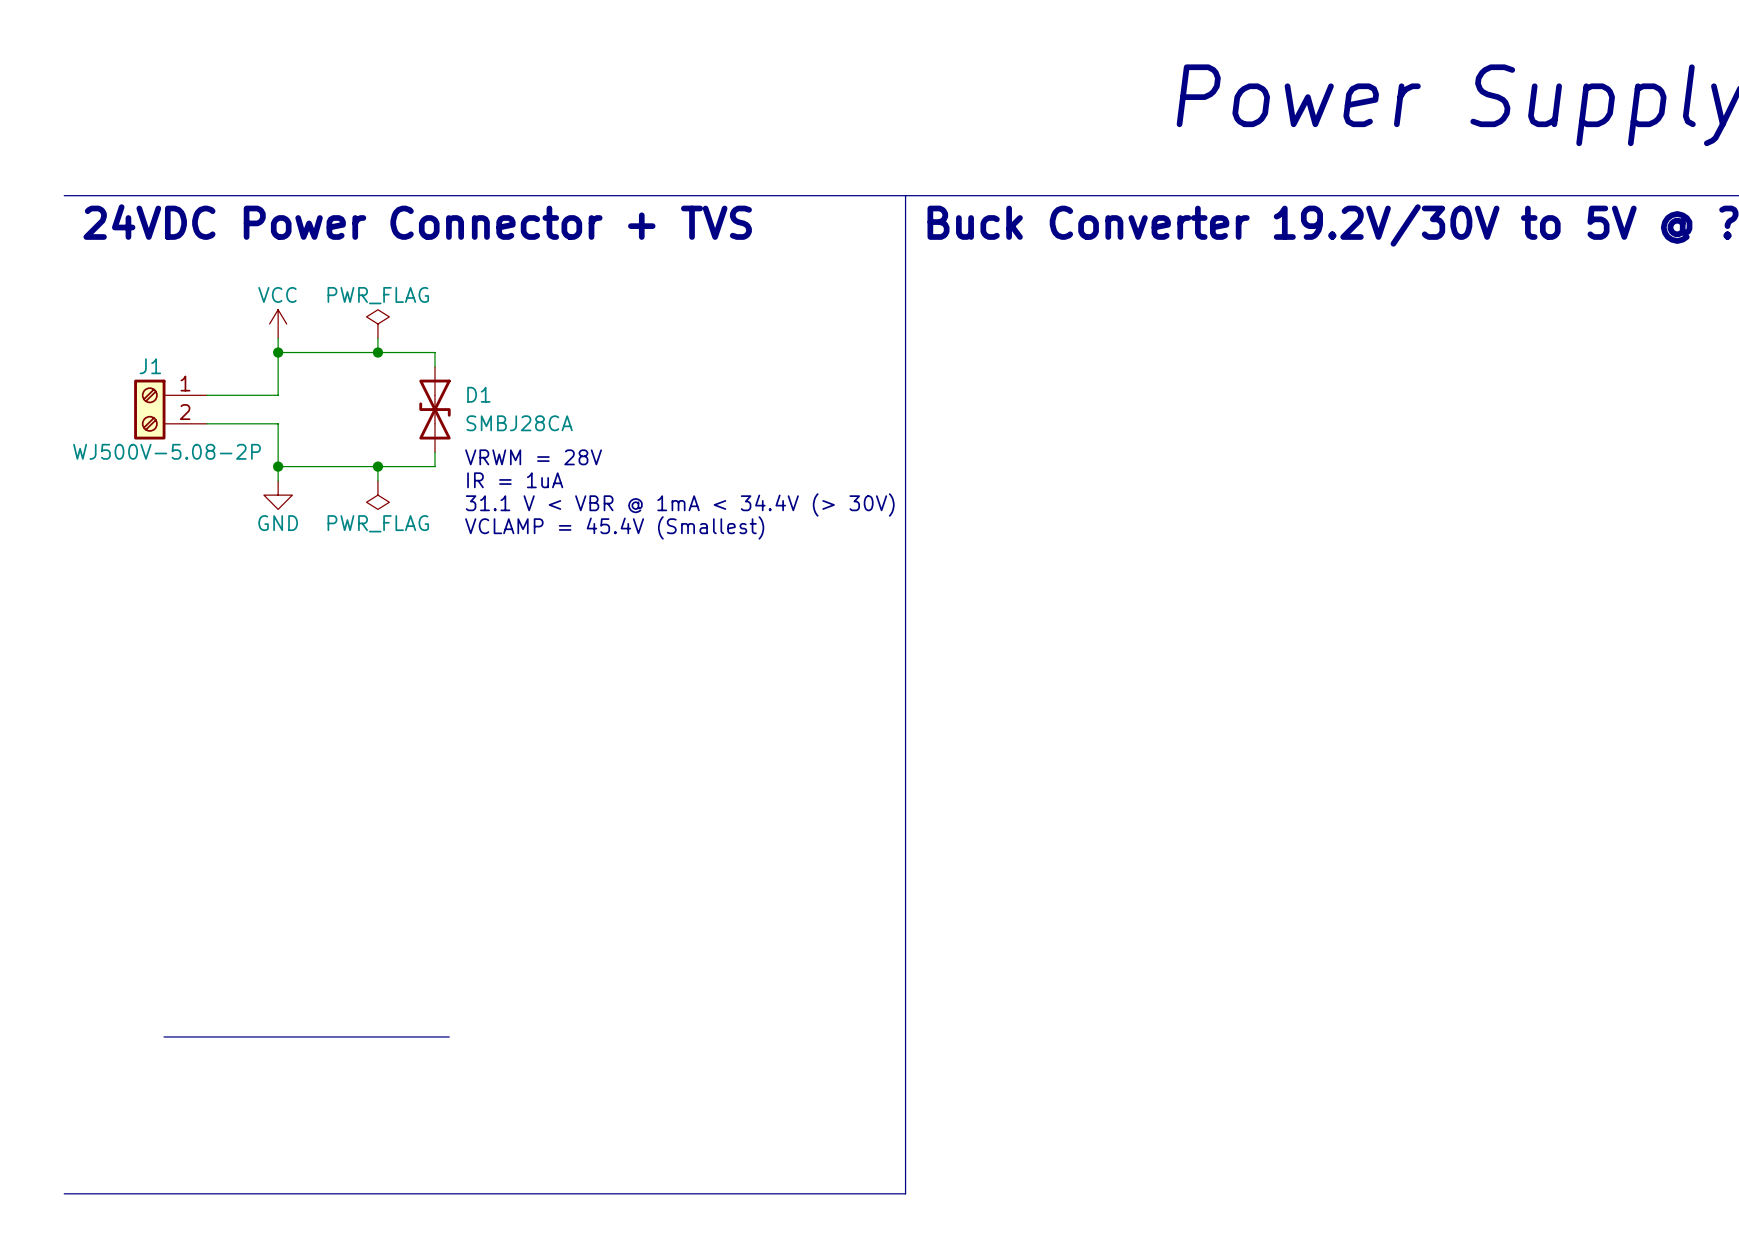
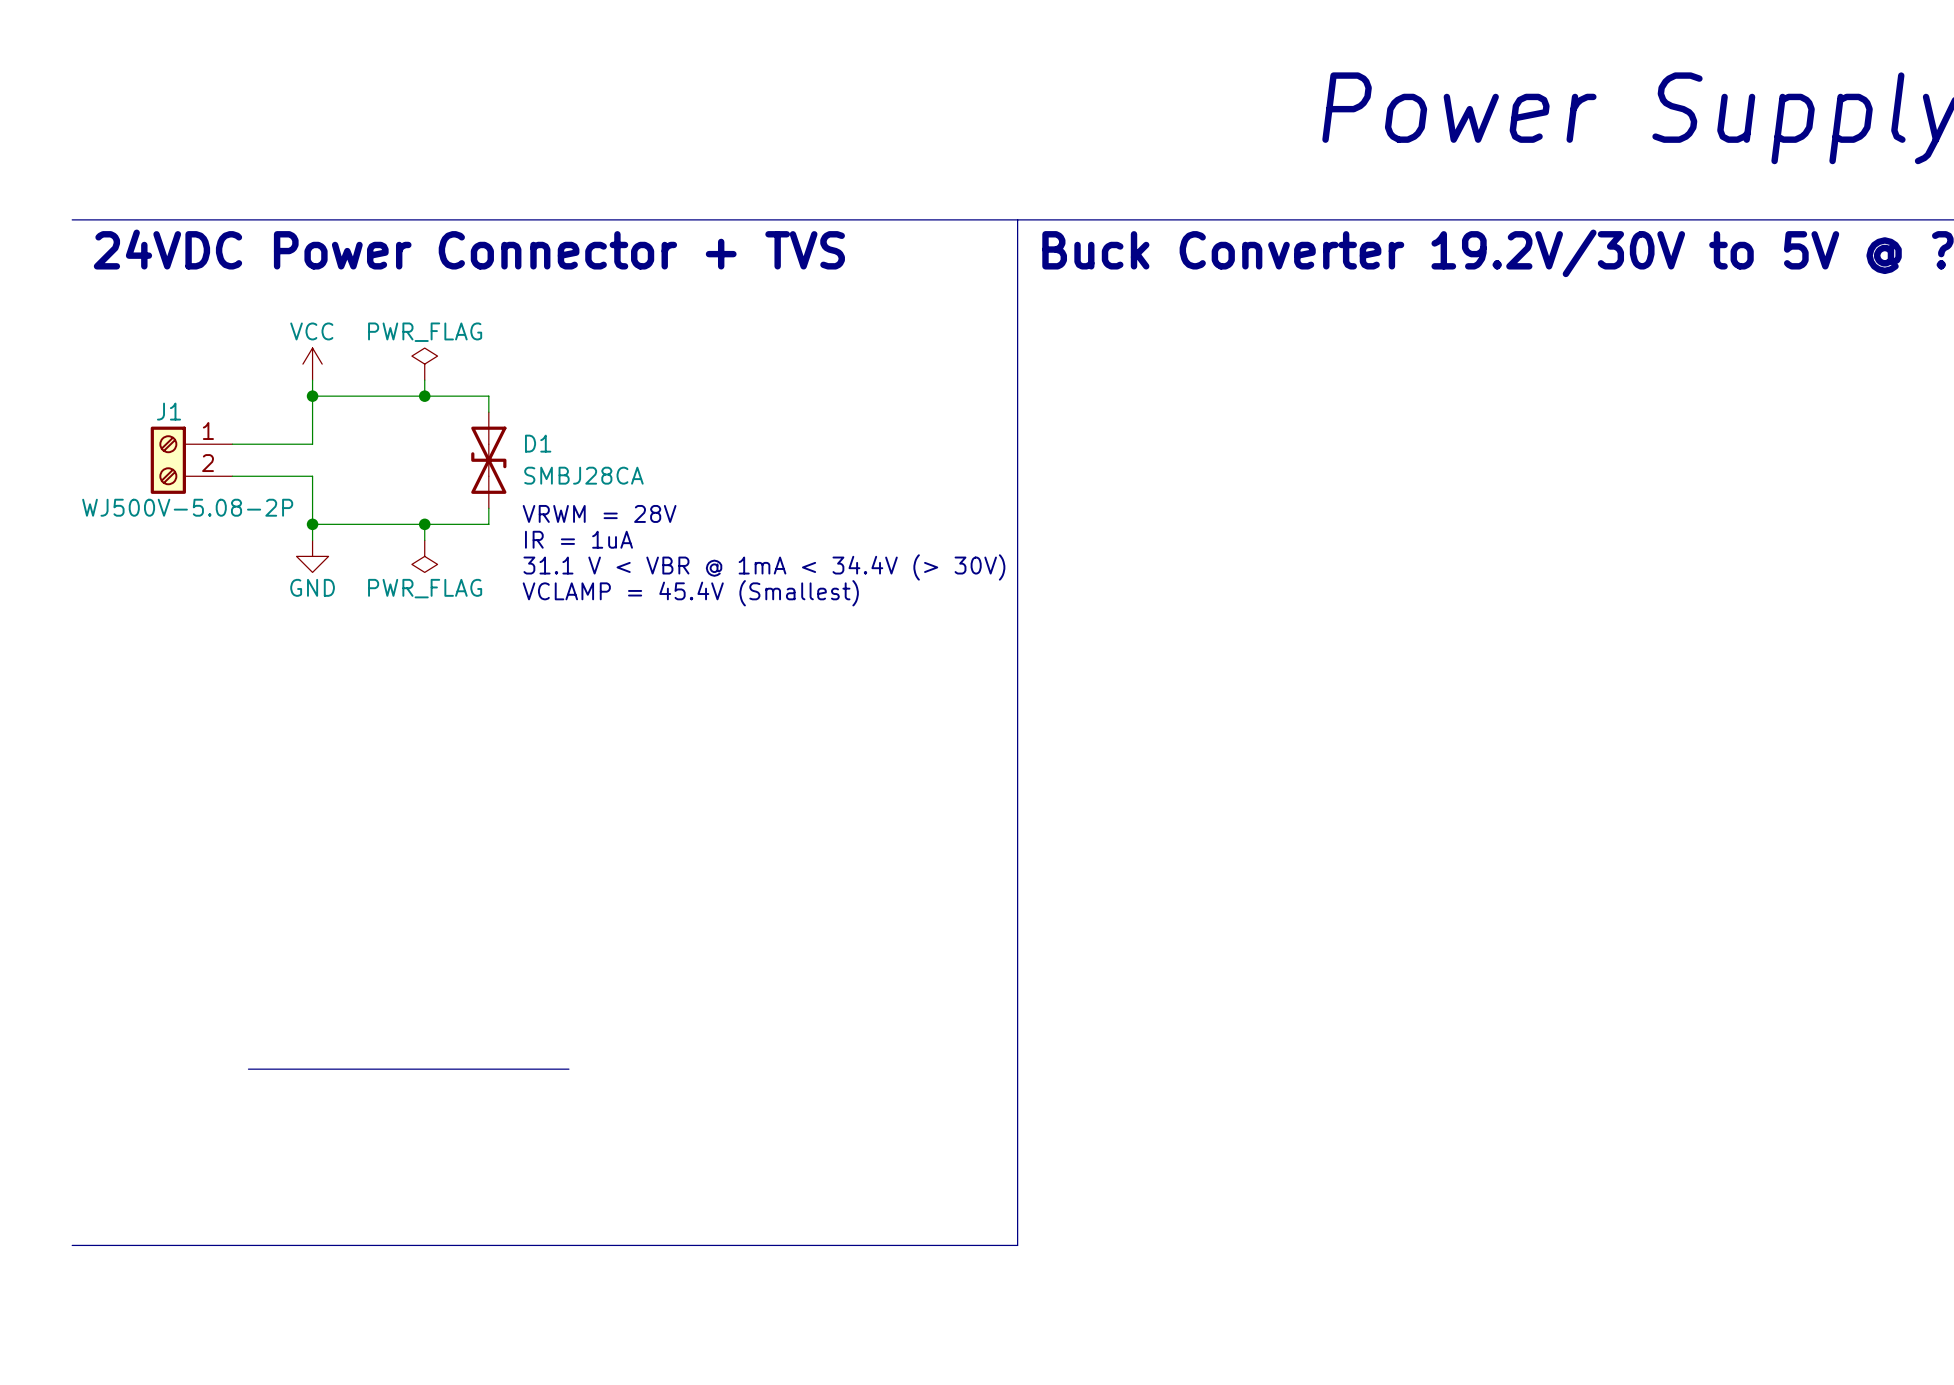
line: (164, 1036) (449, 1036) -> (248, 1069) (568, 1069)
line: (905, 1108) (905, 1193) (64, 1193) -> (1017, 1245) (72, 1245)

